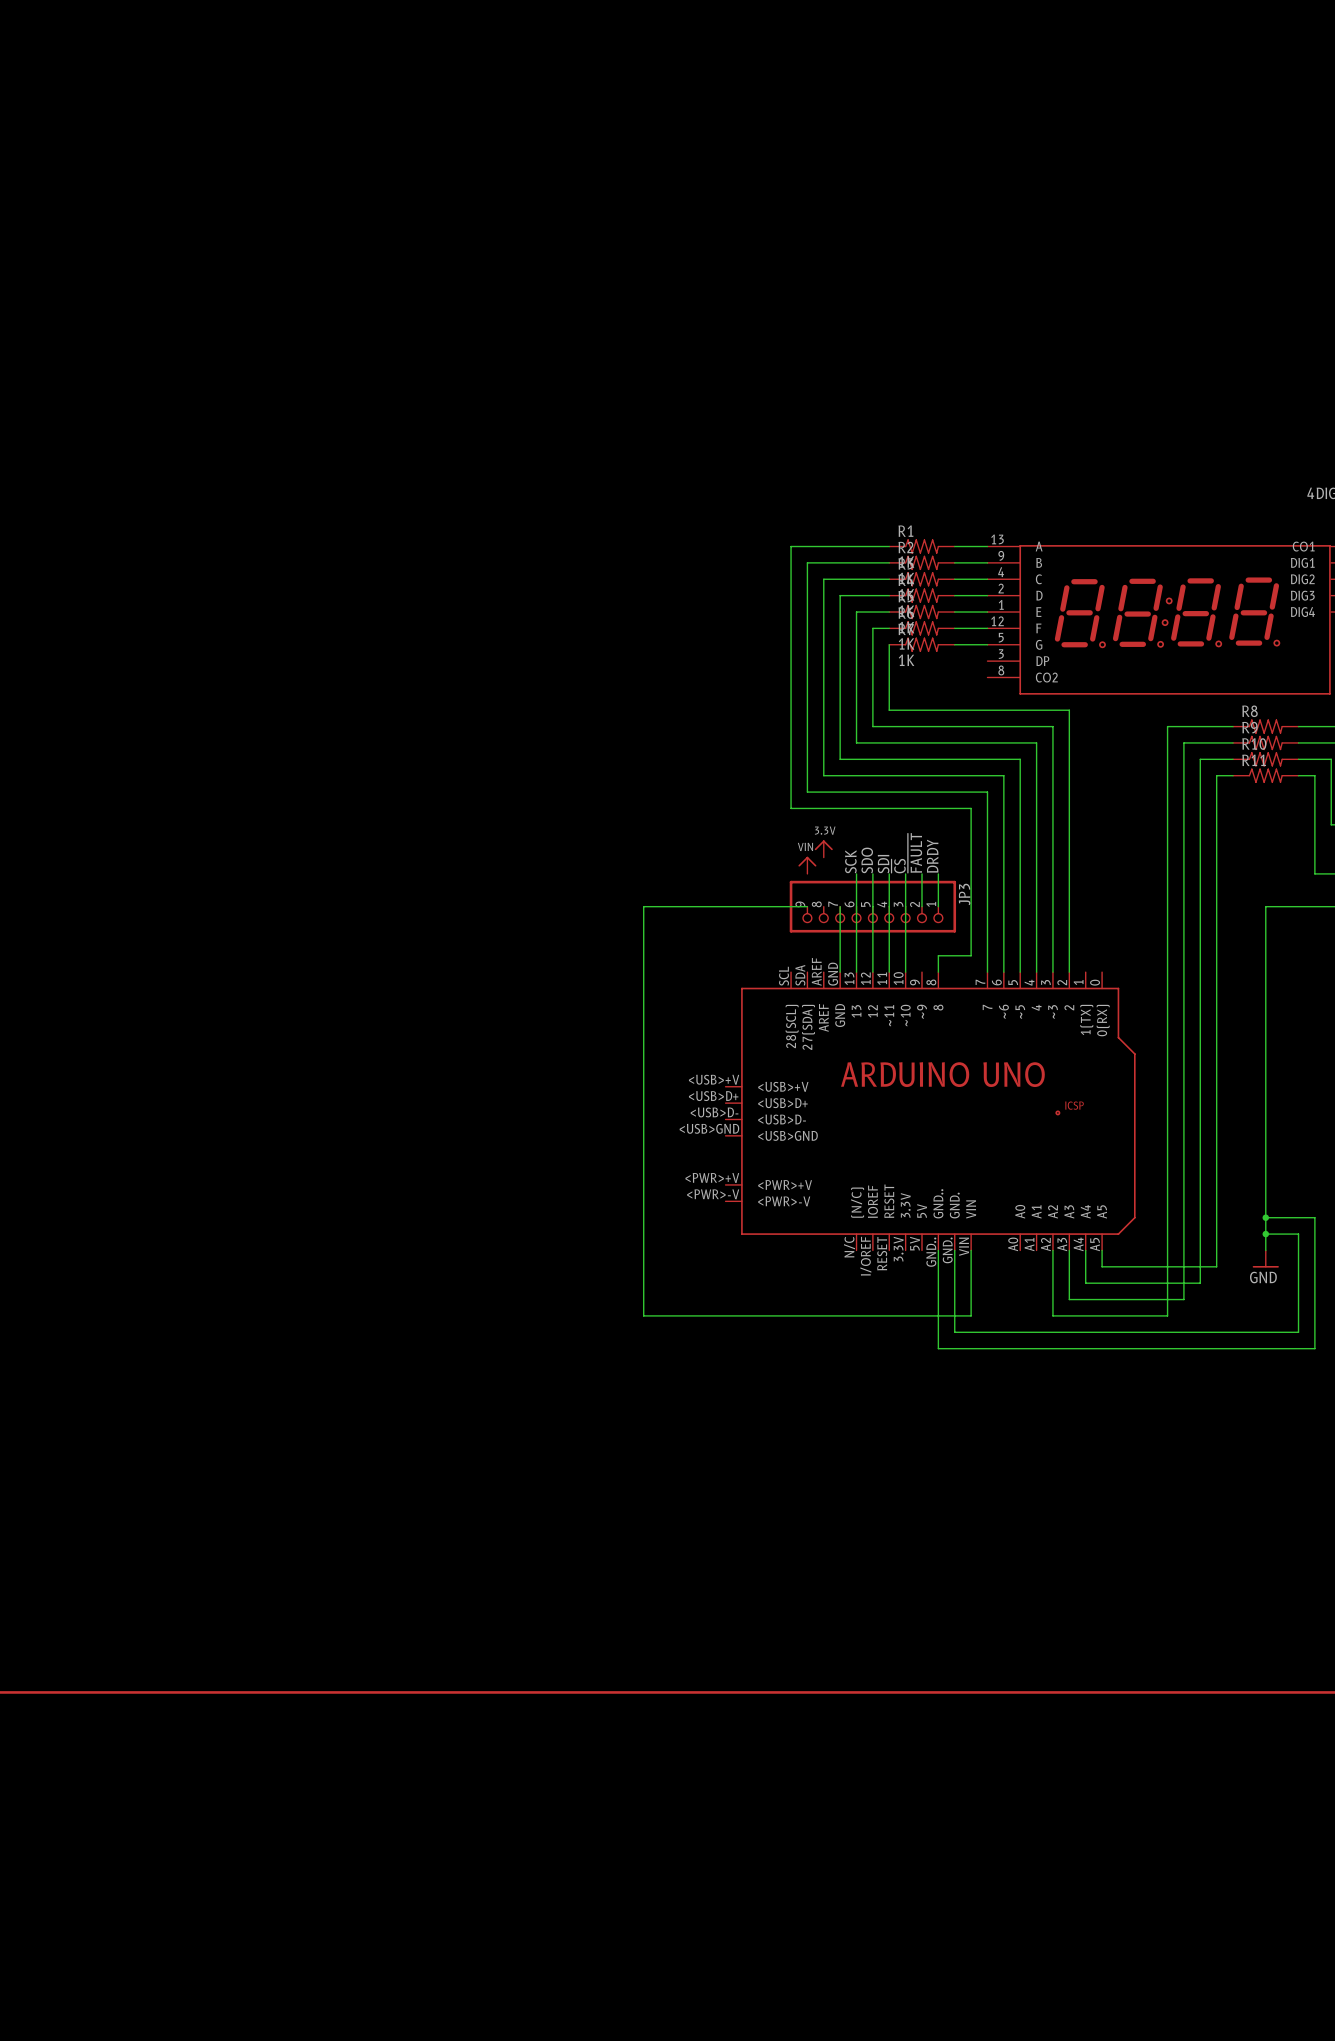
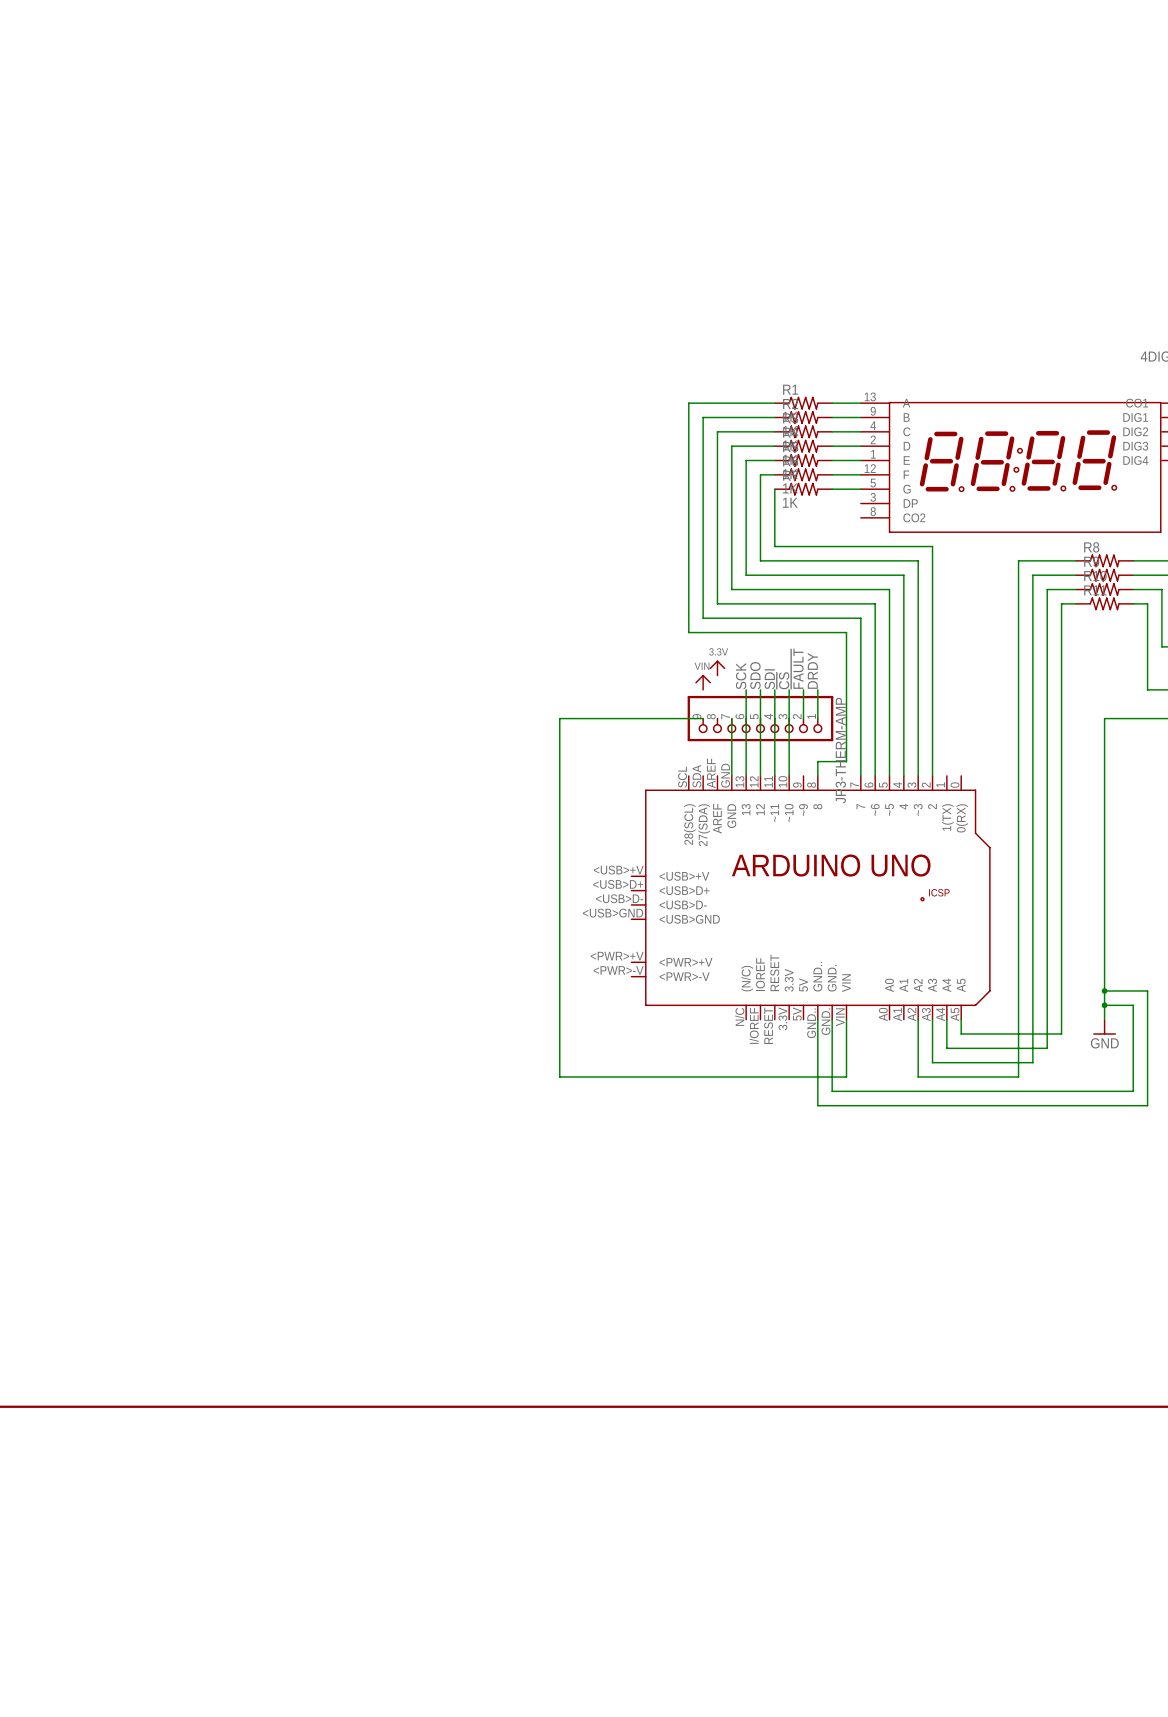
JP3 name: JP3 (964, 894) -> JP3-THERM-AMP (840, 750)

